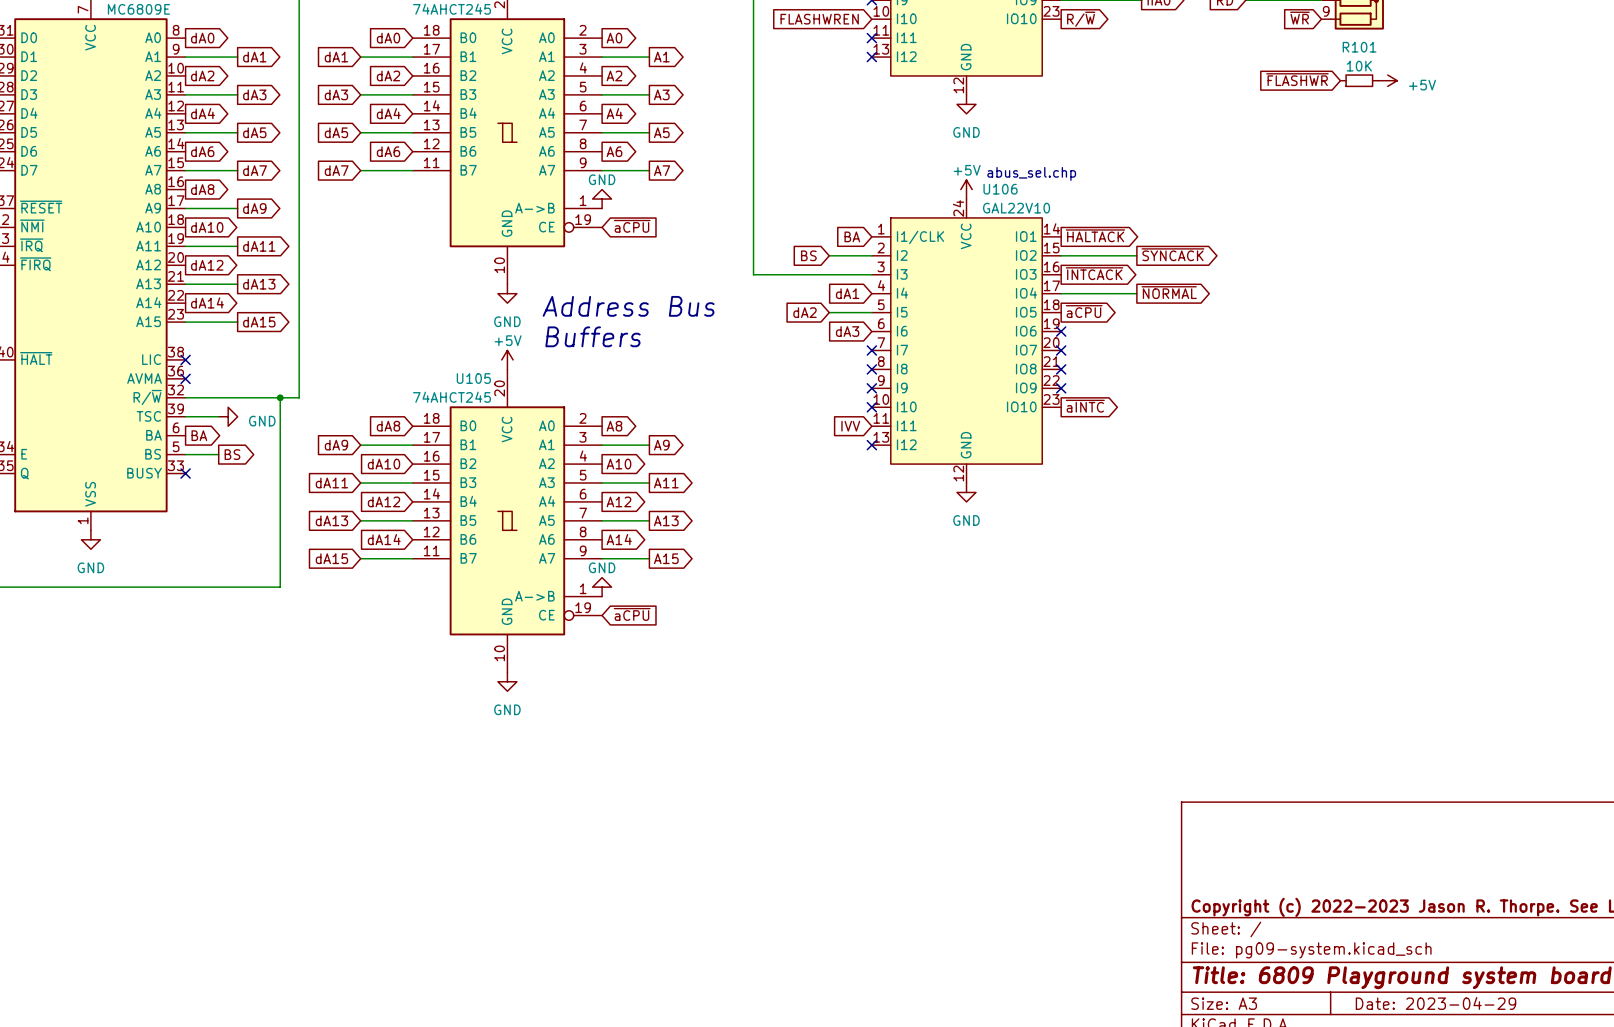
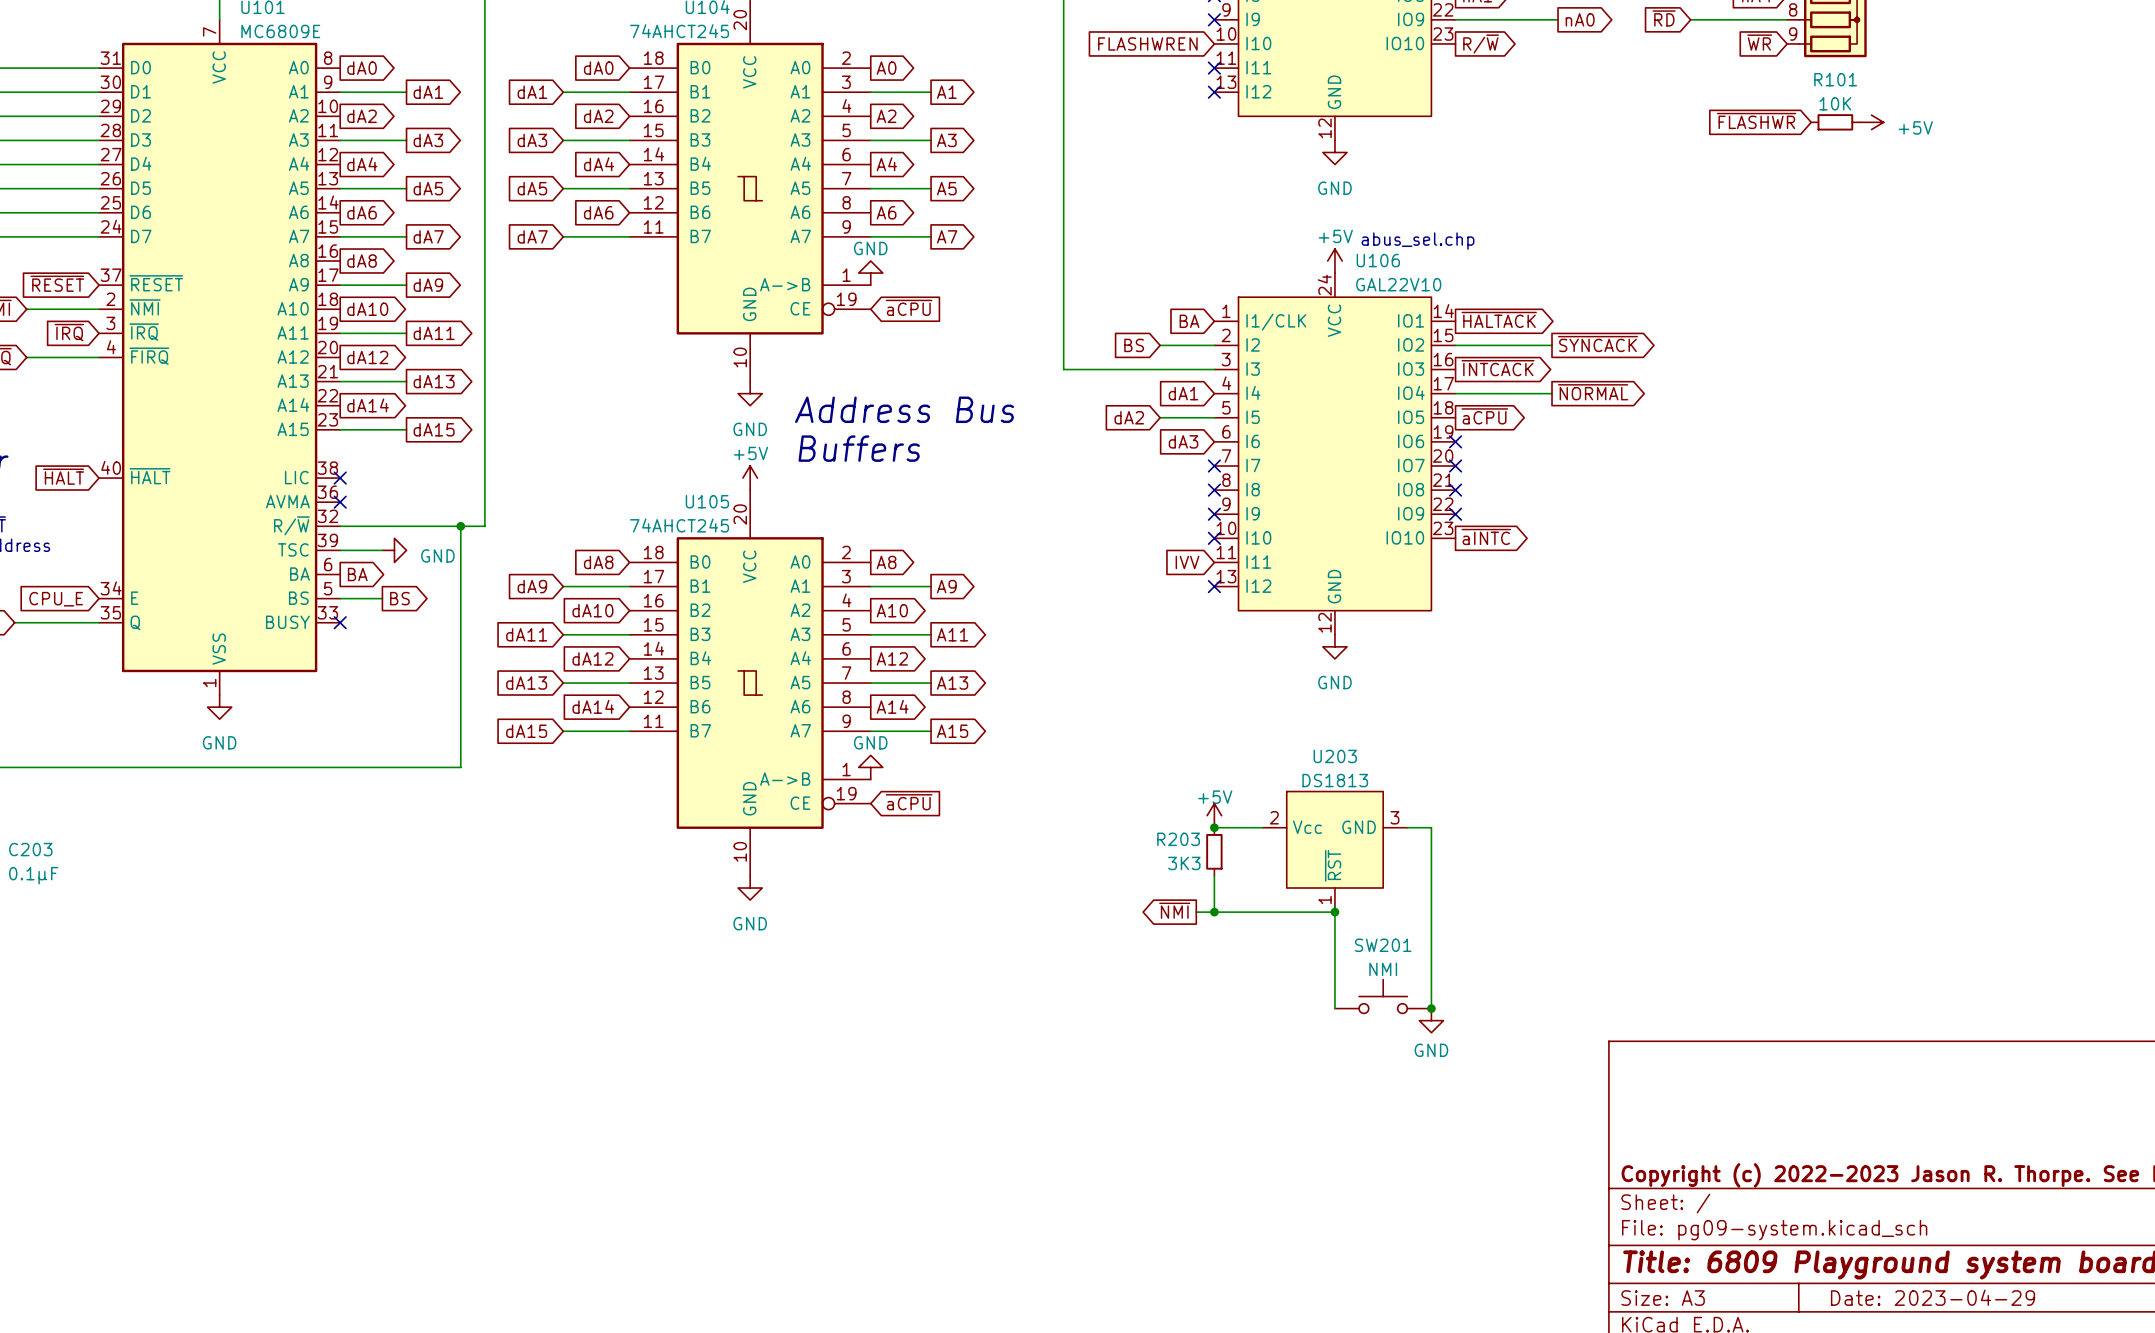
power symbol: none -> +5V (1214, 815)
wire: none -> (1214, 827) (1262, 827)
junction: none -> (1214, 827)
wire: none -> (1407, 827) (1431, 827) (1431, 1008)
R203: none -> 3K3 (1214, 851)
U203: none -> DS1813 (1334, 851)
wire: none -> (1214, 875) (1214, 912)
wire: none -> (1334, 906) (1334, 1008)
global label: none -> ~{NMI} (1174, 910)
wire: none -> (1196, 912) (1334, 912)
junction: none -> (1214, 912)
junction: none -> (1334, 912)
SW201: none -> NMI (1383, 996)
junction: none -> (1431, 1008)
power symbol: none -> GND (1431, 1020)

